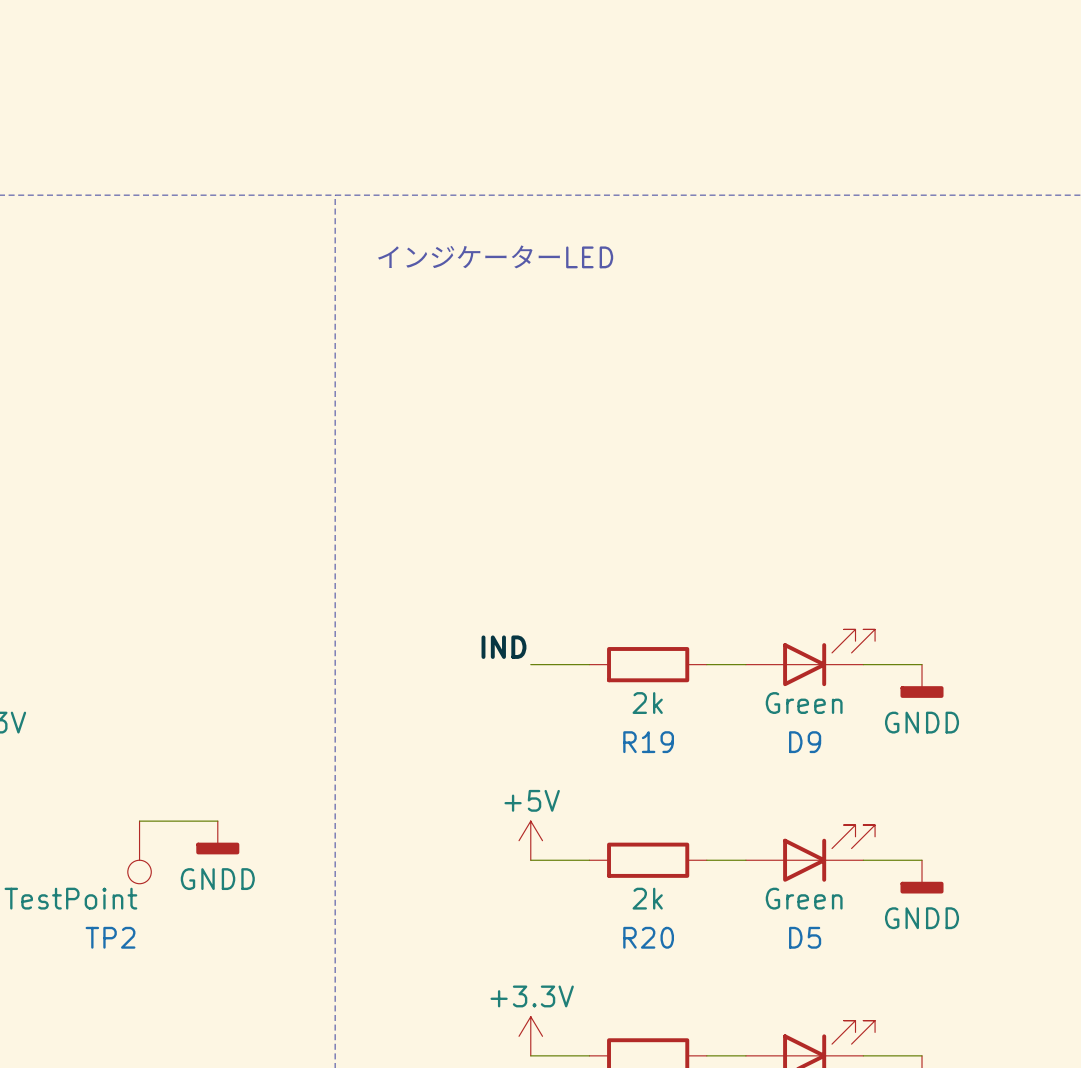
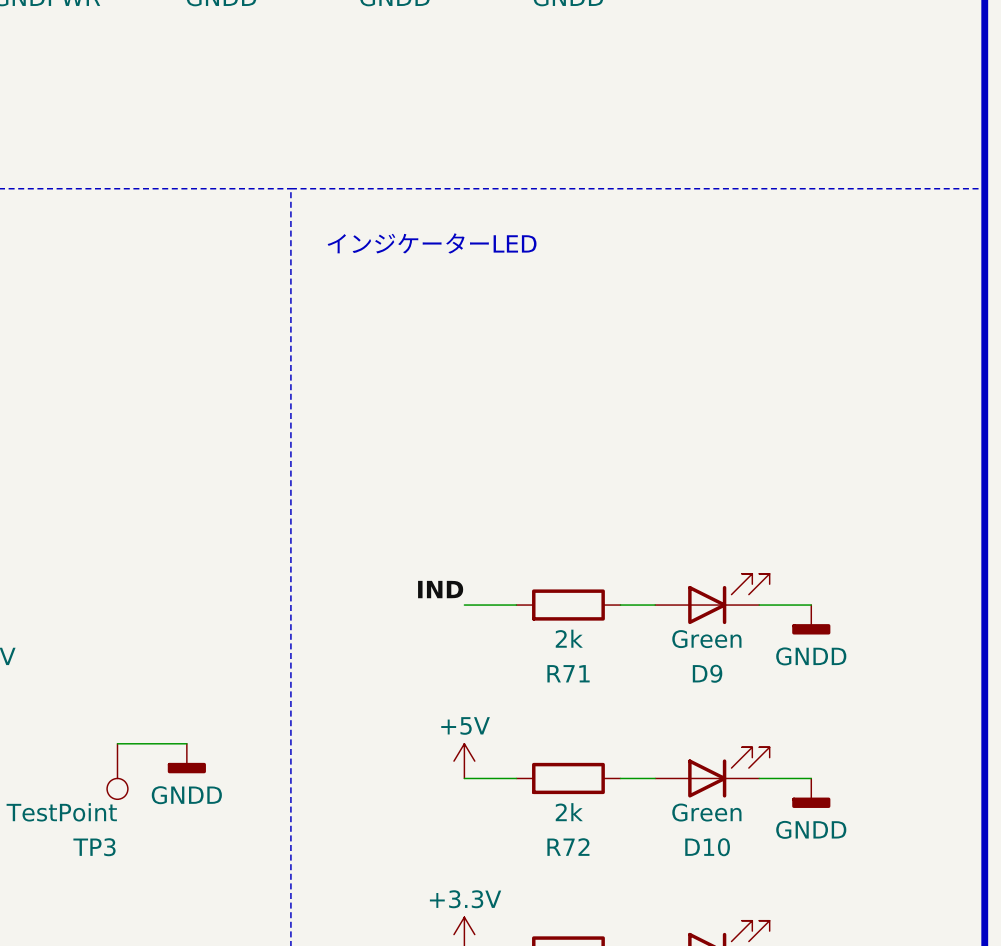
R19 name: R19 (648, 742) -> R71 (568, 673)
TP2 name: TP2 (110, 937) -> TP3 (94, 847)
R20 name: R20 (648, 937) -> R72 (568, 847)
D5 name: D5 (805, 937) -> D10 (707, 847)

